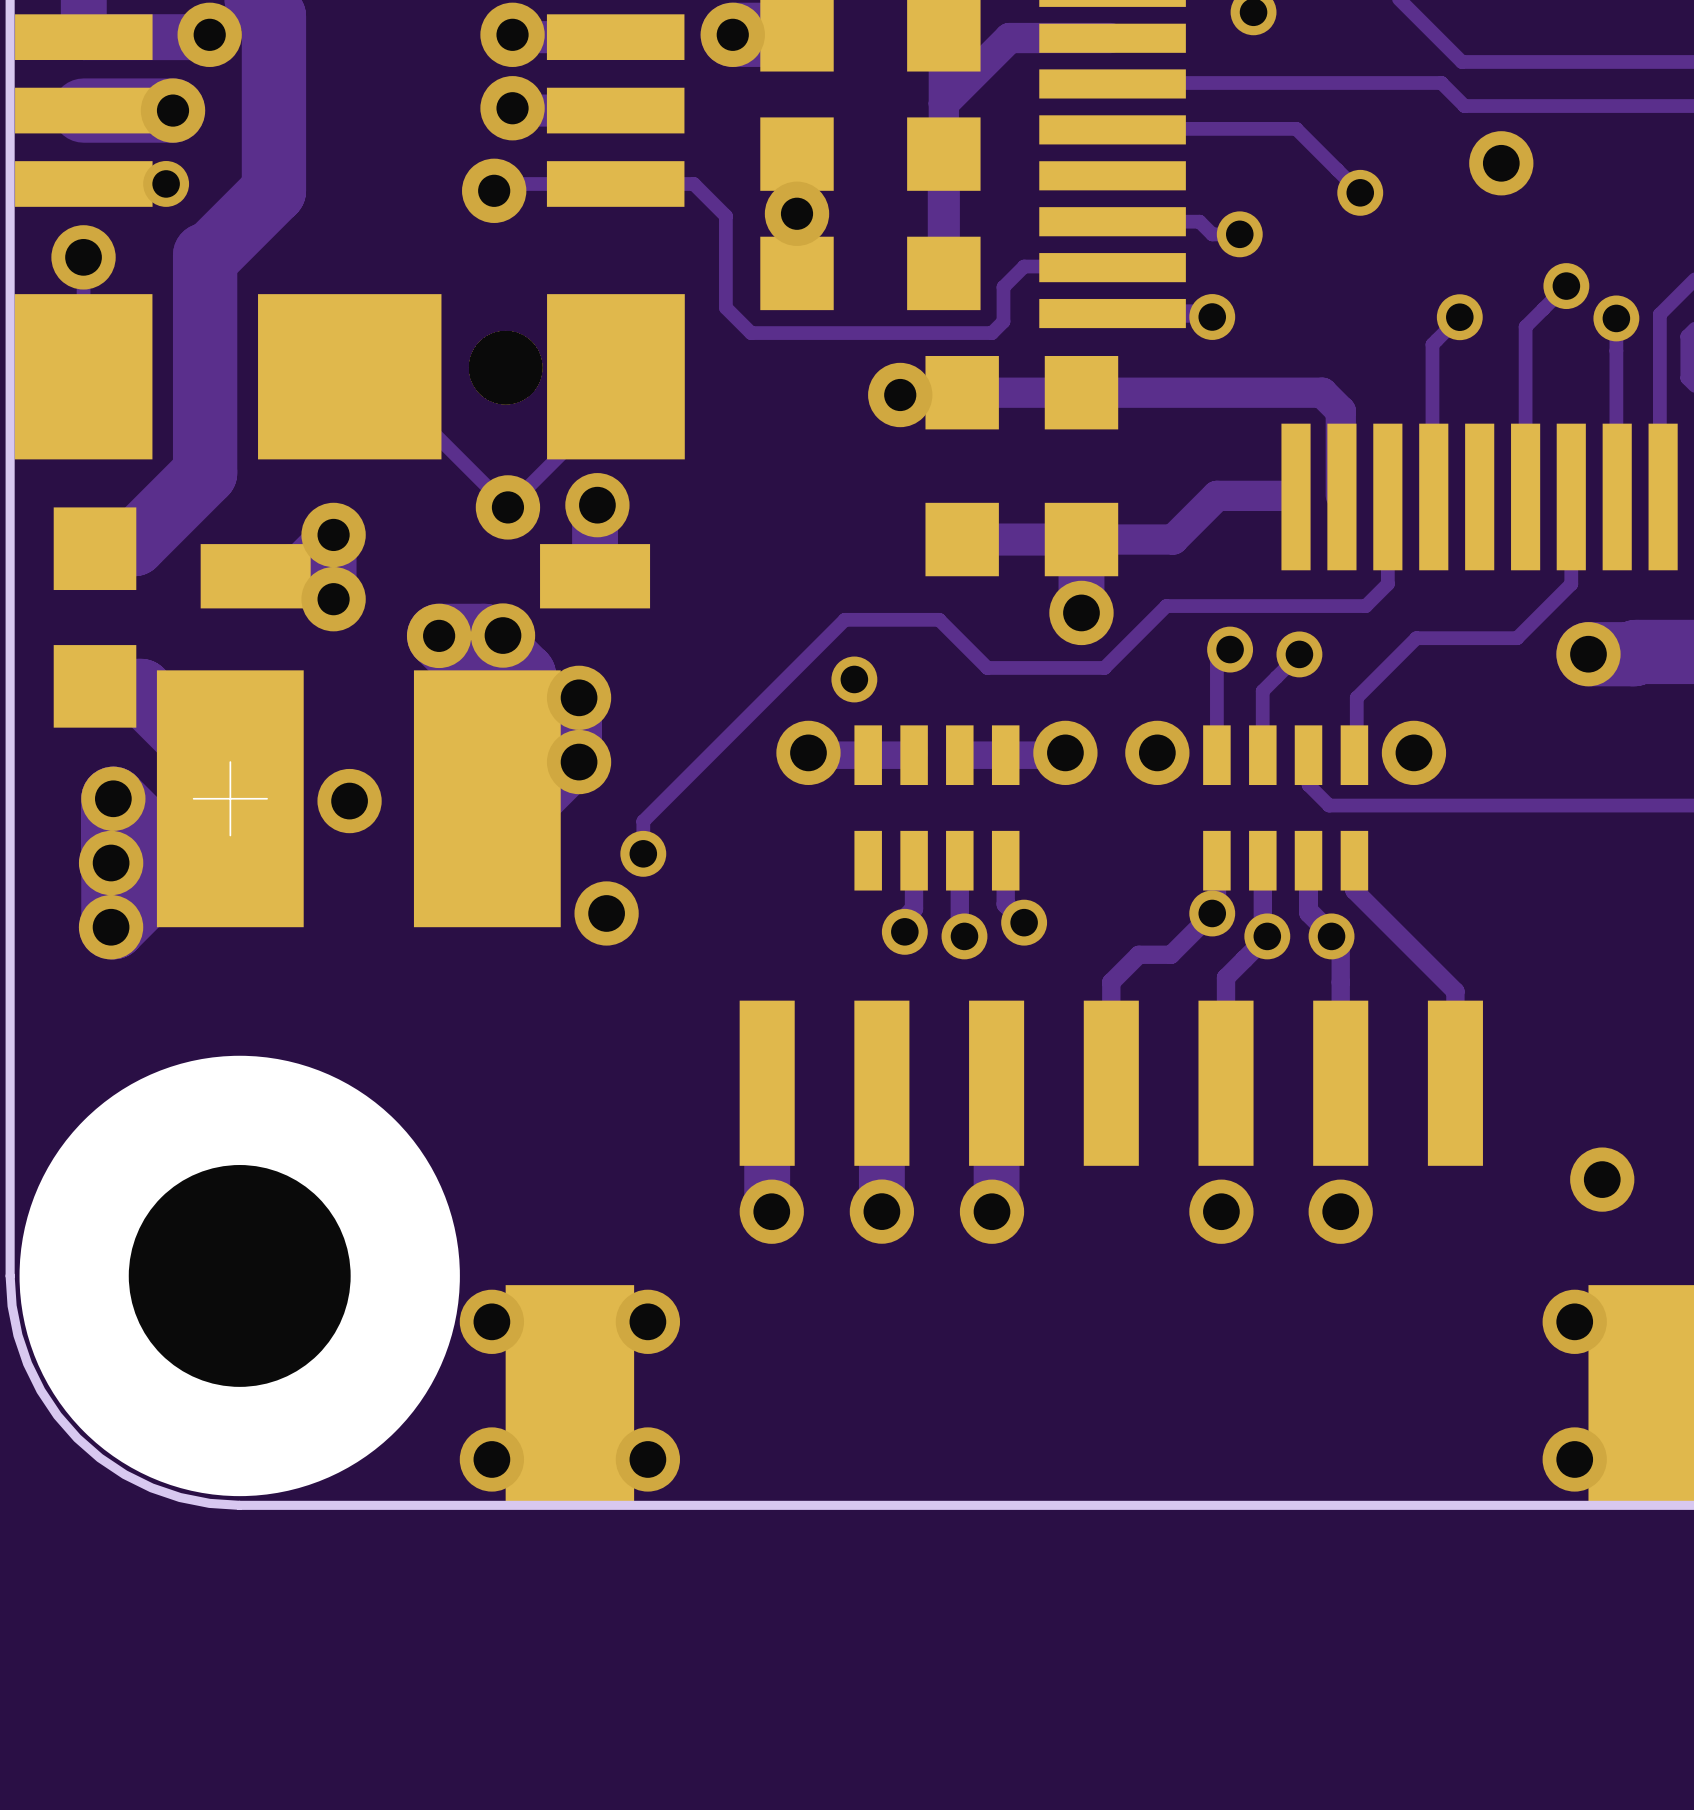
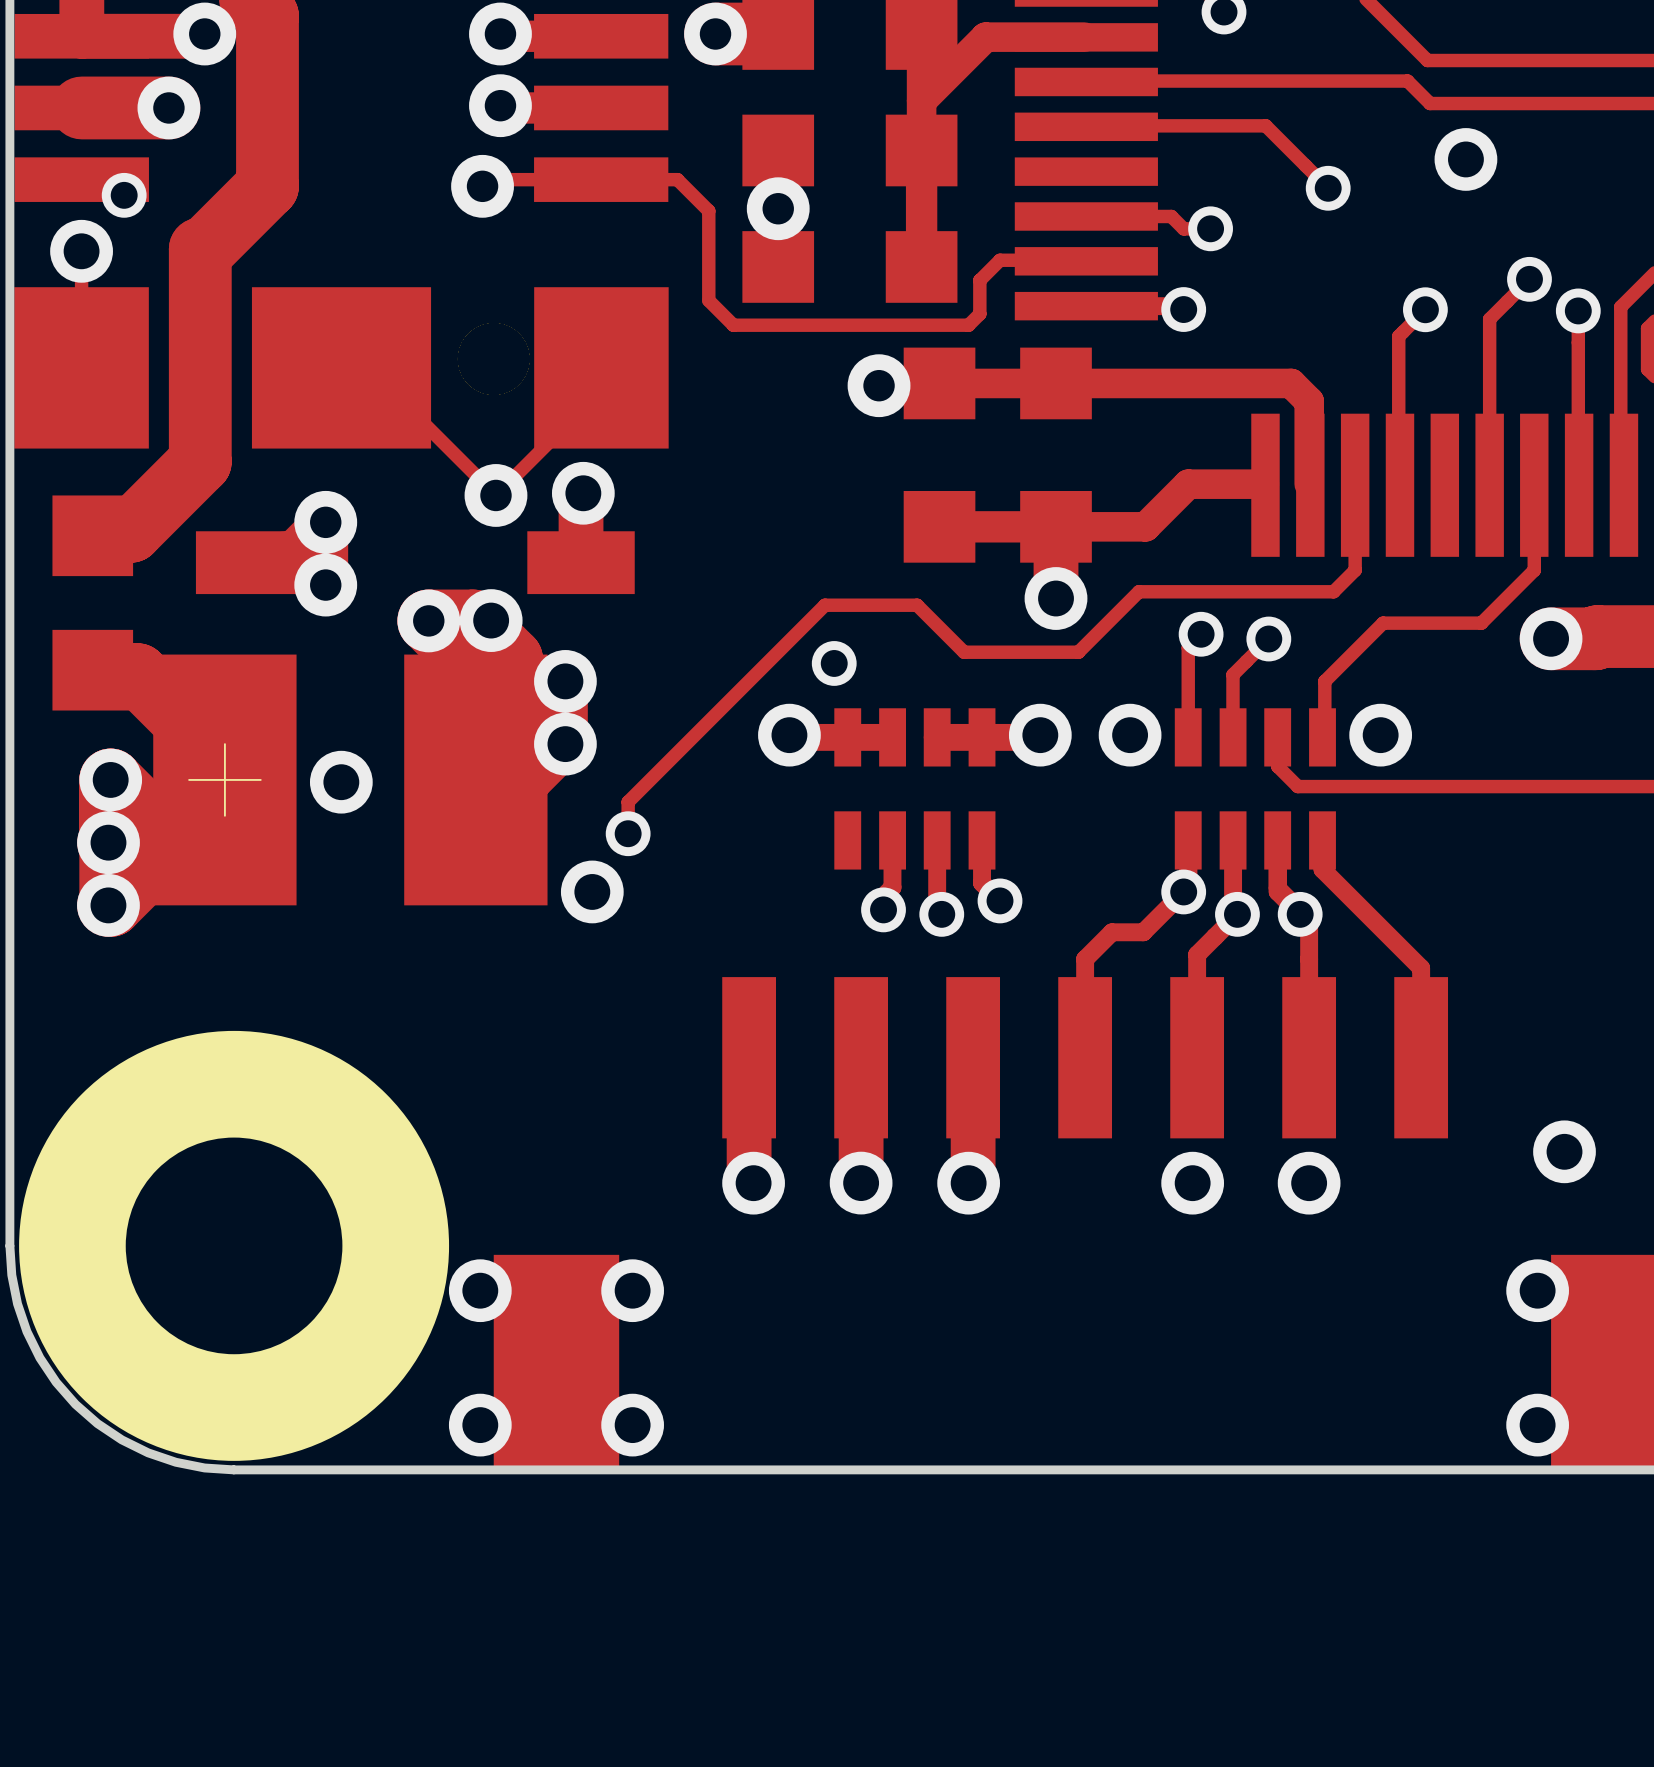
via position: (166, 183) -> (124, 195)

